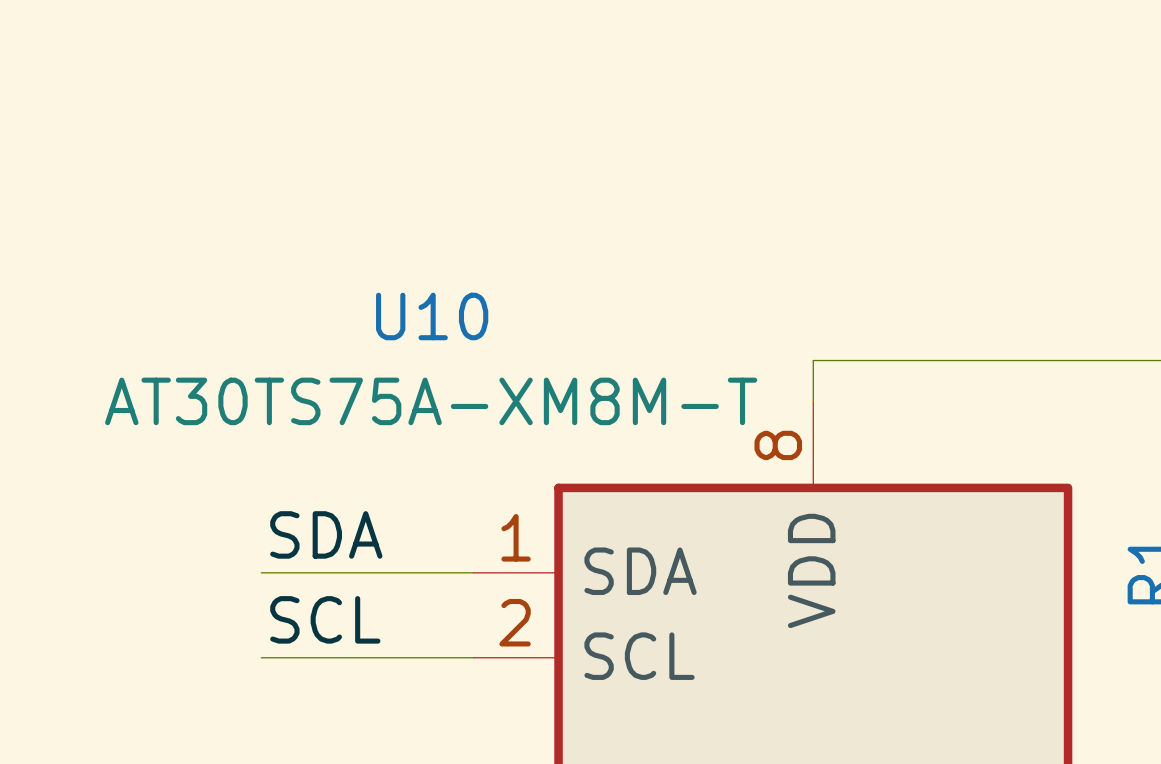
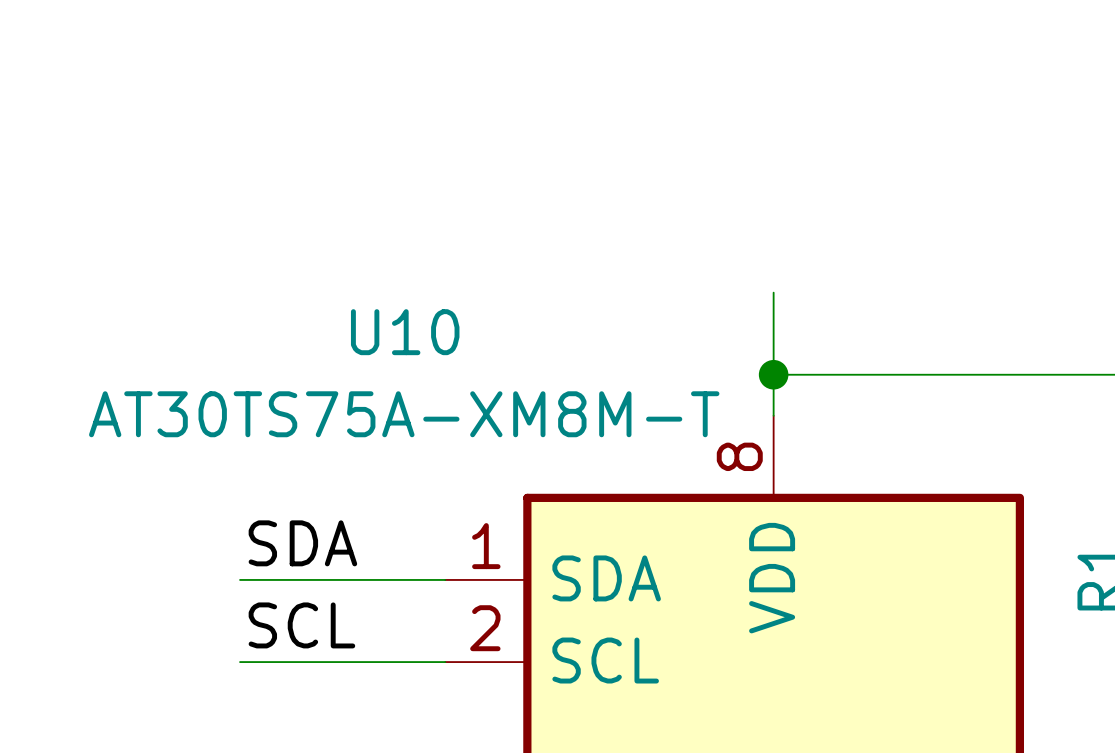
wire: none -> (773, 292) (773, 374)
junction: none -> (773, 374)

